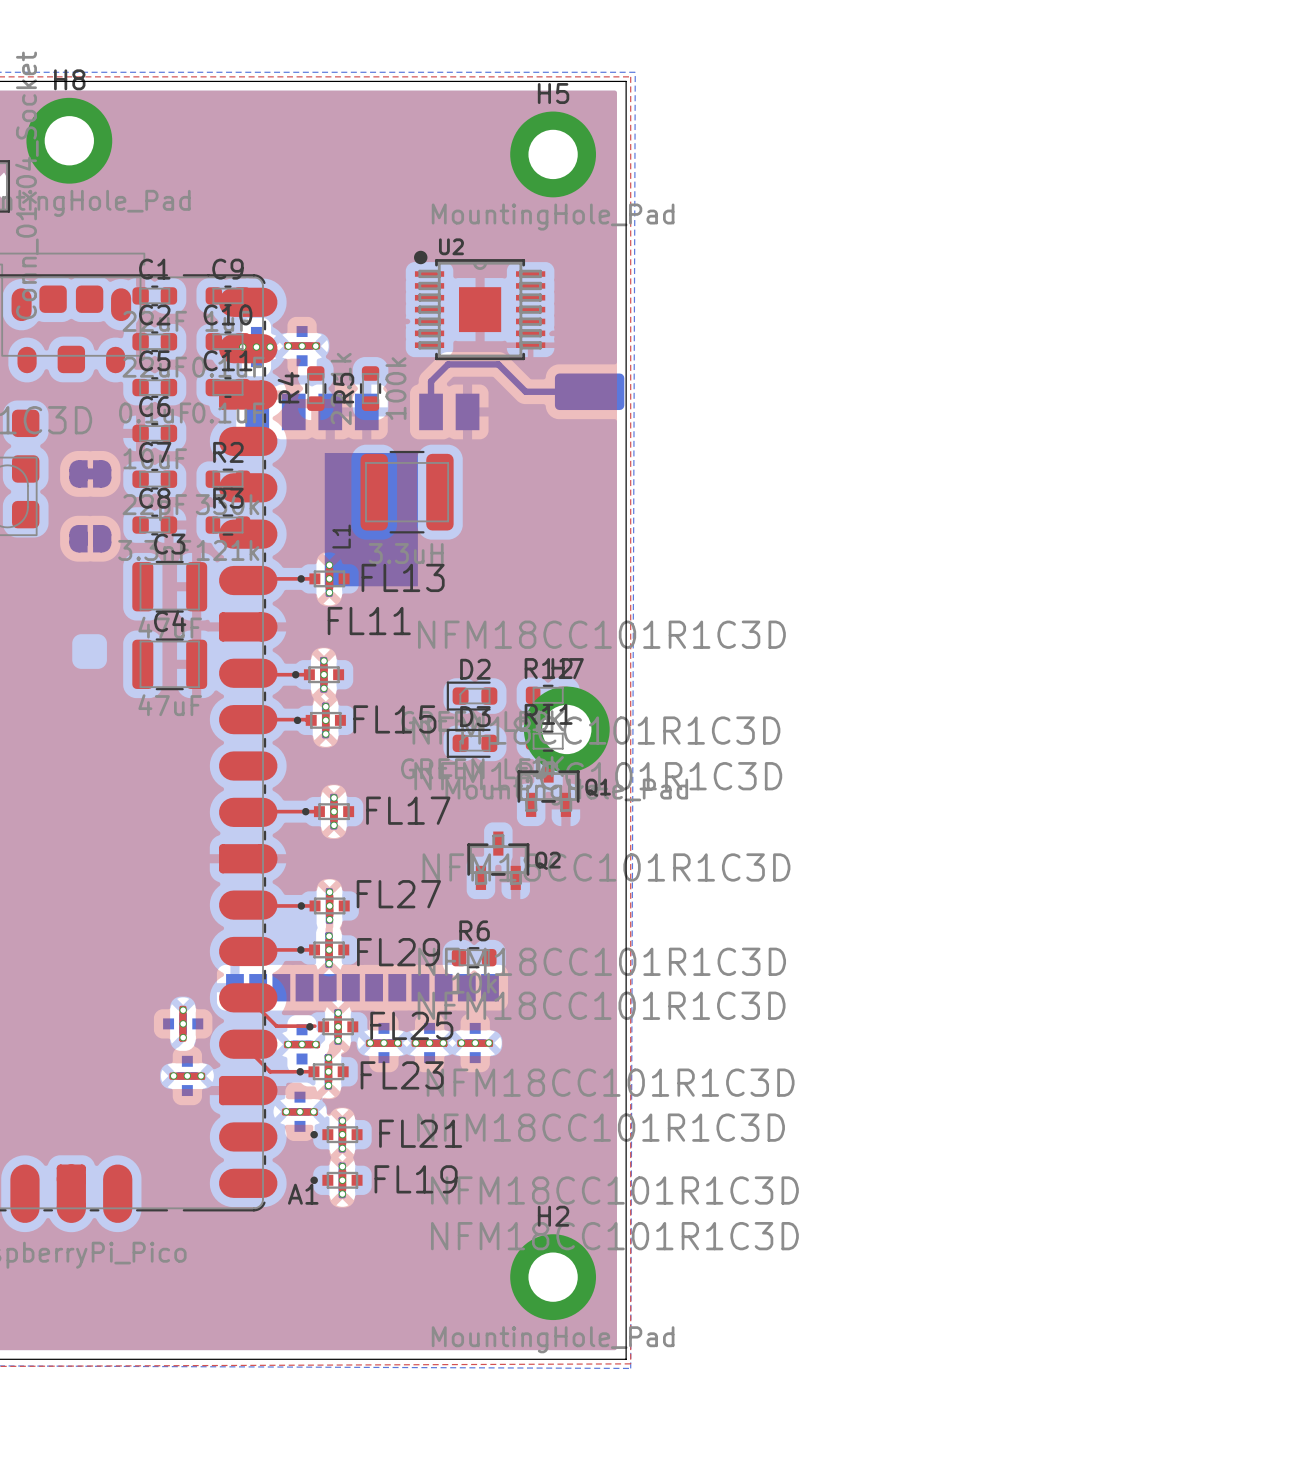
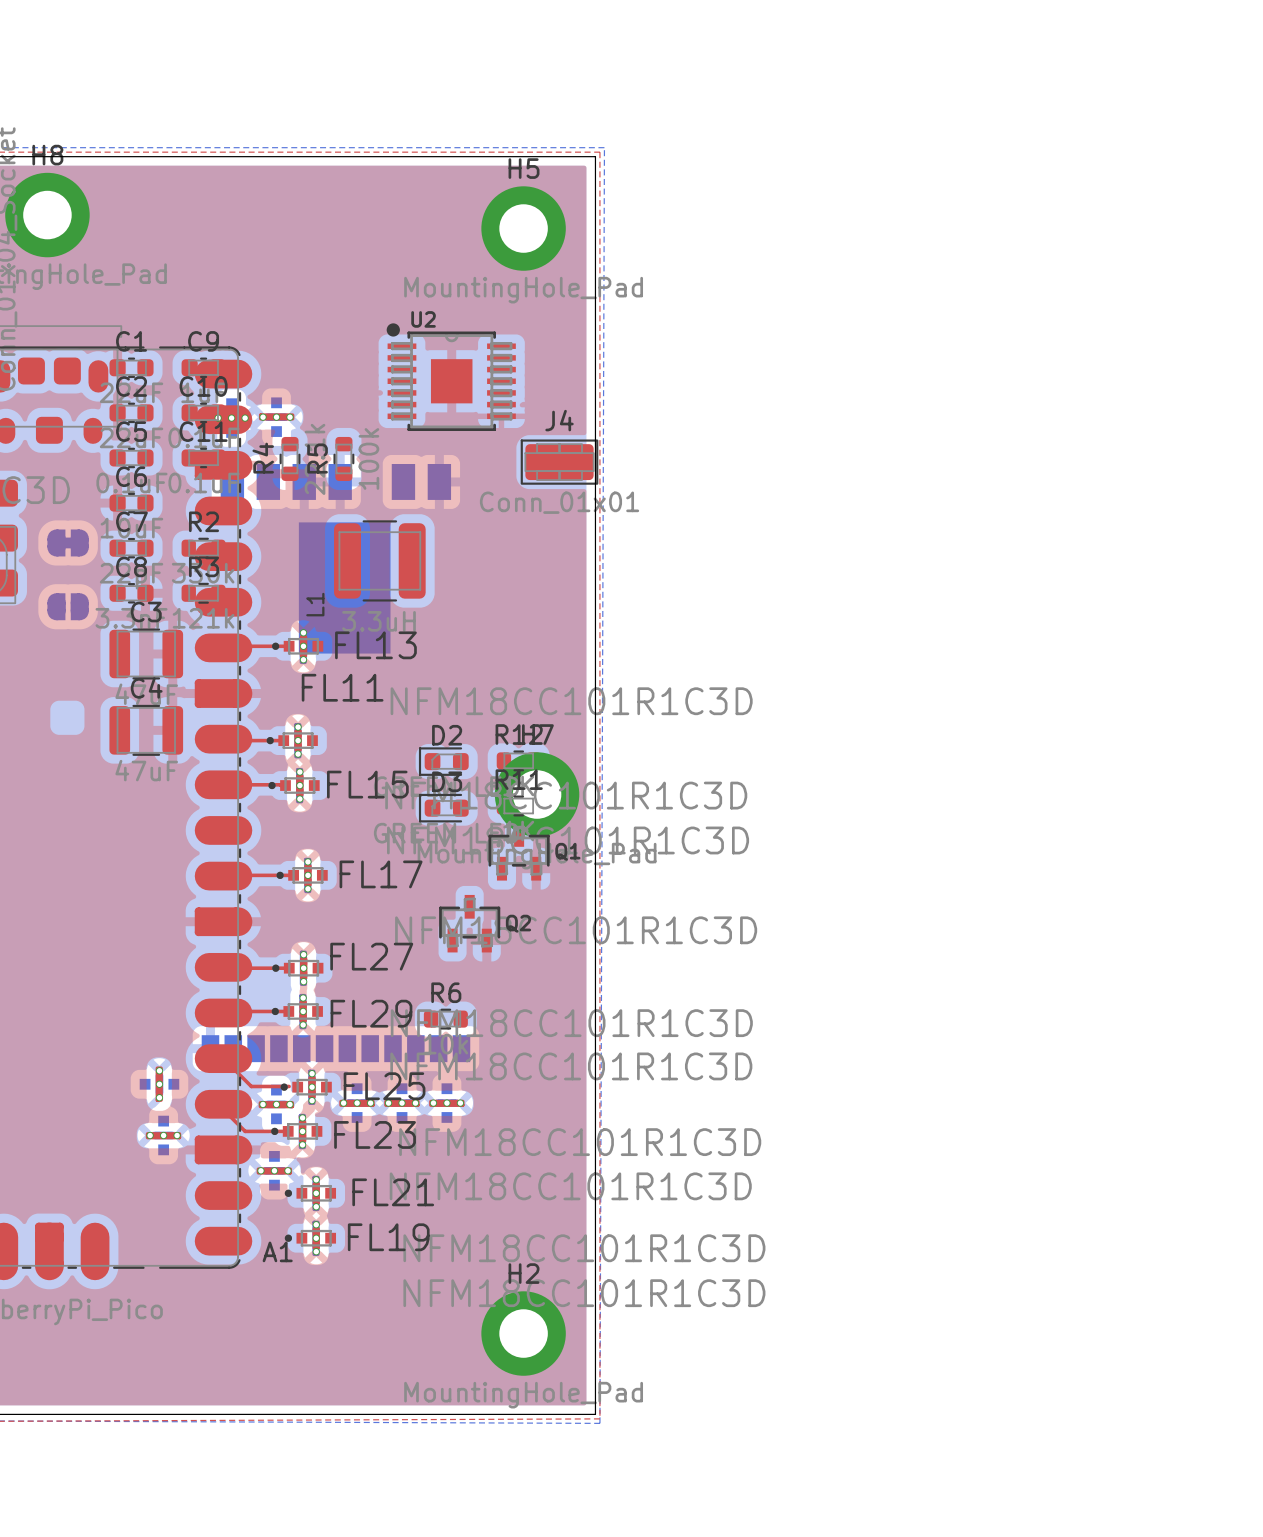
bottom track: (589, 391) (525, 391) (498, 364) (448, 364) (431, 381) (431, 411) -> none
J4 side: bottom (589, 391) -> top (559, 462)

